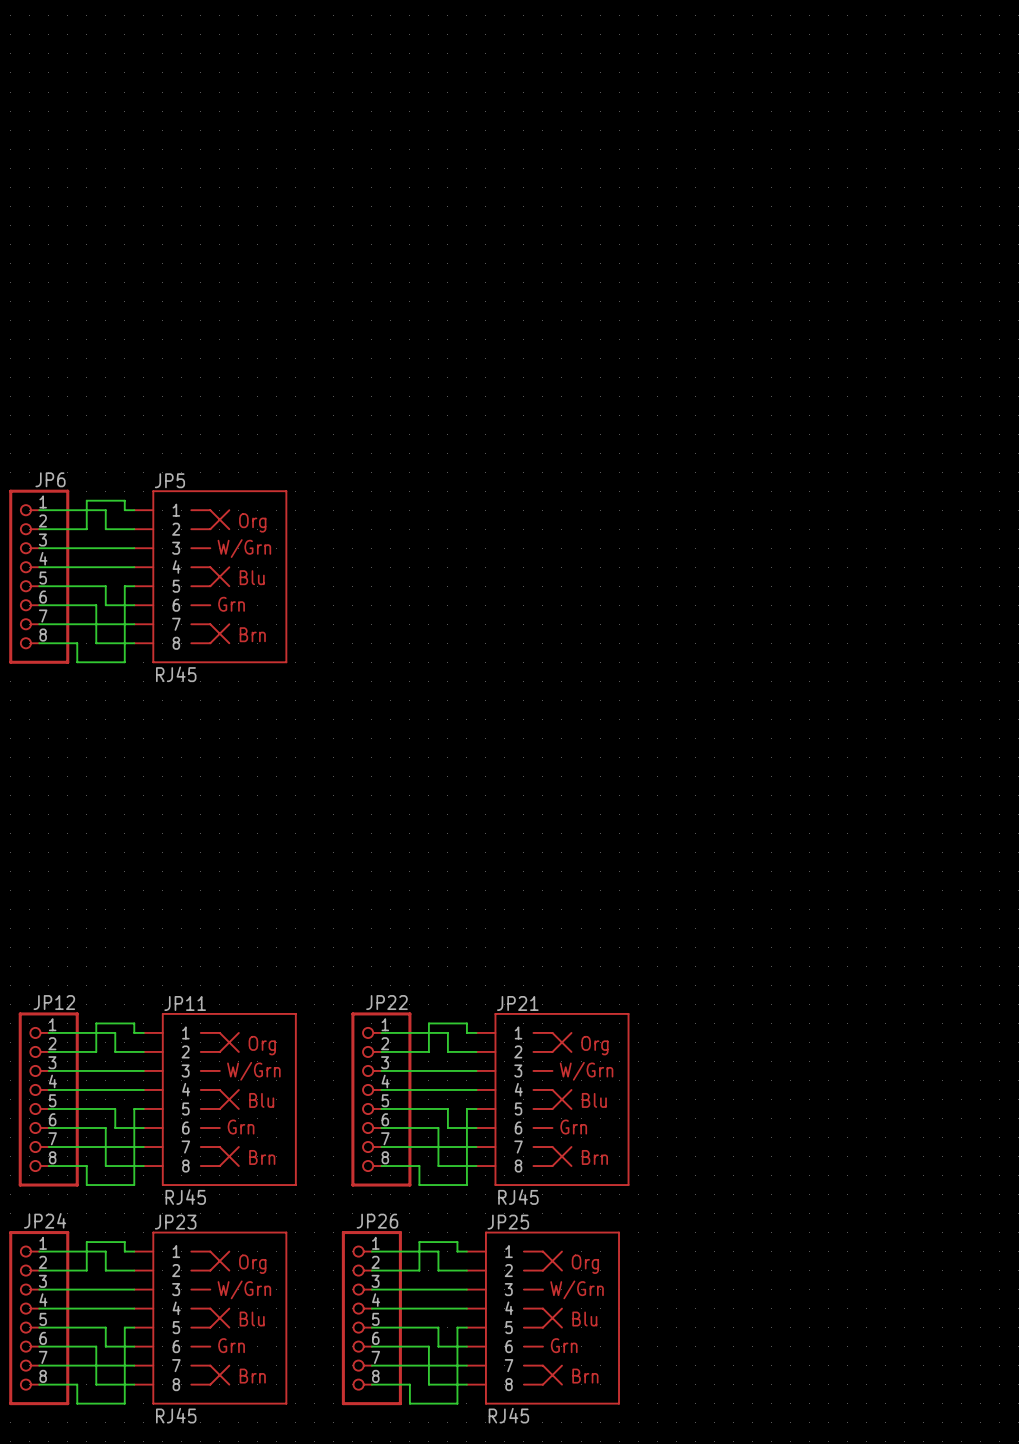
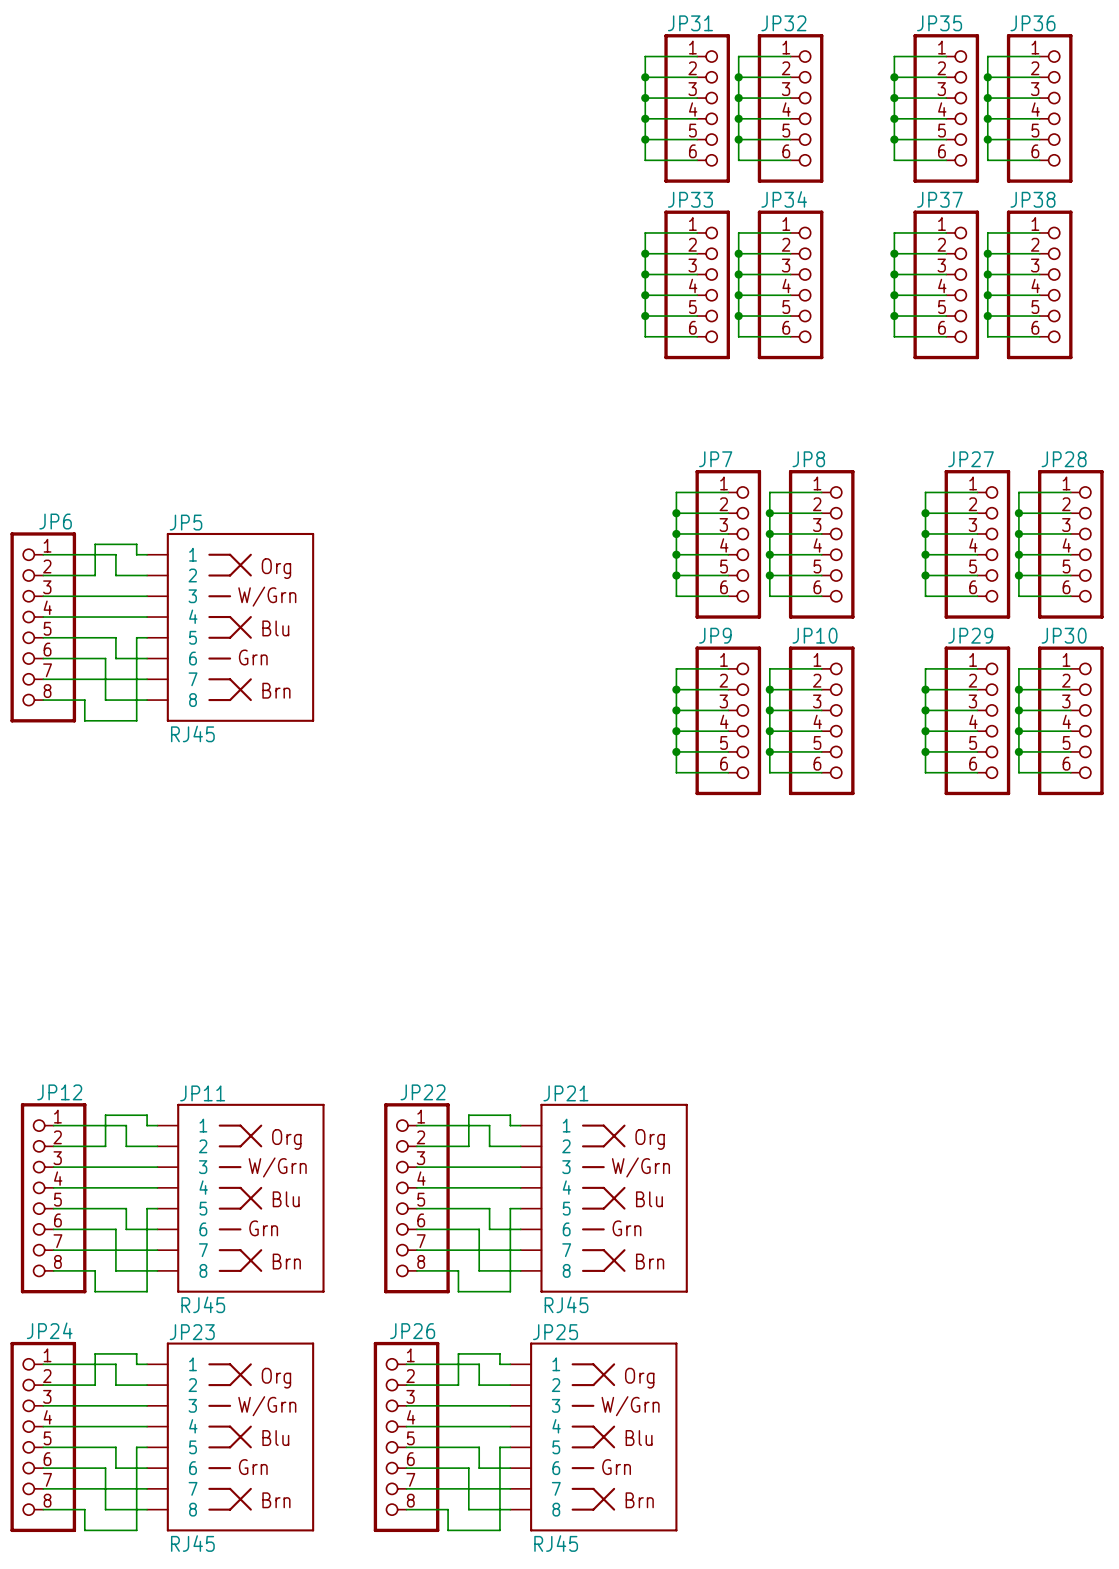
wire: none -> (697, 56) (645, 56) (645, 160) (697, 160)
wire: none -> (790, 56) (738, 56) (738, 160) (790, 160)
wire: none -> (946, 56) (894, 56) (894, 160) (946, 160)
wire: none -> (1039, 56) (987, 56) (987, 160) (1039, 160)
wire: none -> (645, 77) (697, 77)
junction: none -> (645, 77)
wire: none -> (738, 77) (790, 77)
junction: none -> (738, 77)
wire: none -> (894, 77) (946, 77)
junction: none -> (894, 77)
wire: none -> (987, 77) (1039, 77)
junction: none -> (987, 77)
wire: none -> (645, 98) (697, 98)
junction: none -> (645, 98)
wire: none -> (738, 98) (790, 98)
junction: none -> (738, 98)
wire: none -> (894, 98) (946, 98)
junction: none -> (894, 98)
wire: none -> (987, 98) (1039, 98)
junction: none -> (987, 98)
JP31: none -> (697, 108)
JP32: none -> (790, 108)
JP35: none -> (946, 108)
JP36: none -> (1039, 108)
wire: none -> (645, 118) (697, 118)
junction: none -> (645, 118)
wire: none -> (738, 118) (790, 118)
junction: none -> (738, 118)
wire: none -> (894, 118) (946, 118)
junction: none -> (894, 118)
wire: none -> (987, 118) (1039, 118)
junction: none -> (987, 118)
wire: none -> (645, 139) (697, 139)
junction: none -> (645, 139)
wire: none -> (738, 139) (790, 139)
junction: none -> (738, 139)
wire: none -> (894, 139) (946, 139)
junction: none -> (894, 139)
wire: none -> (987, 139) (1039, 139)
junction: none -> (987, 139)
wire: none -> (697, 232) (645, 232) (645, 336) (697, 336)
wire: none -> (790, 232) (738, 232) (738, 336) (790, 336)
wire: none -> (946, 232) (894, 232) (894, 336) (946, 336)
wire: none -> (1039, 232) (987, 232) (987, 336) (1039, 336)
wire: none -> (645, 253) (697, 253)
junction: none -> (645, 253)
wire: none -> (738, 253) (790, 253)
junction: none -> (738, 253)
wire: none -> (894, 253) (946, 253)
junction: none -> (894, 253)
wire: none -> (987, 253) (1039, 253)
junction: none -> (987, 253)
wire: none -> (645, 274) (697, 274)
junction: none -> (645, 274)
wire: none -> (738, 274) (790, 274)
junction: none -> (738, 274)
wire: none -> (894, 274) (946, 274)
junction: none -> (894, 274)
wire: none -> (987, 274) (1039, 274)
junction: none -> (987, 274)
JP33: none -> (697, 284)
JP34: none -> (790, 284)
JP37: none -> (946, 284)
JP38: none -> (1039, 284)
wire: none -> (645, 295) (697, 295)
junction: none -> (645, 295)
wire: none -> (738, 295) (790, 295)
junction: none -> (738, 295)
wire: none -> (894, 295) (946, 295)
junction: none -> (894, 295)
wire: none -> (987, 295) (1039, 295)
junction: none -> (987, 295)
wire: none -> (645, 316) (697, 316)
junction: none -> (645, 316)
wire: none -> (738, 316) (790, 316)
junction: none -> (738, 316)
wire: none -> (894, 316) (946, 316)
junction: none -> (894, 316)
wire: none -> (987, 316) (1039, 316)
junction: none -> (987, 316)
wire: none -> (728, 492) (676, 492) (676, 596) (728, 596)
wire: none -> (821, 492) (769, 492) (769, 596) (821, 596)
wire: none -> (977, 492) (925, 492) (925, 596) (977, 596)
wire: none -> (1070, 492) (1018, 492) (1018, 596) (1070, 596)
wire: none -> (676, 513) (728, 513)
junction: none -> (676, 513)
wire: none -> (769, 513) (821, 513)
junction: none -> (769, 513)
wire: none -> (925, 513) (977, 513)
junction: none -> (925, 513)
wire: none -> (1018, 513) (1070, 513)
junction: none -> (1018, 513)
wire: none -> (676, 533) (728, 533)
junction: none -> (676, 533)
wire: none -> (769, 533) (821, 533)
junction: none -> (769, 533)
wire: none -> (925, 533) (977, 533)
junction: none -> (925, 533)
wire: none -> (1018, 533) (1070, 533)
junction: none -> (1018, 533)
JP7: none -> (728, 544)
JP8: none -> (821, 544)
JP27: none -> (977, 544)
JP28: none -> (1070, 544)
wire: none -> (676, 554) (728, 554)
junction: none -> (676, 554)
wire: none -> (769, 554) (821, 554)
junction: none -> (769, 554)
wire: none -> (925, 554) (977, 554)
junction: none -> (925, 554)
wire: none -> (1018, 554) (1070, 554)
junction: none -> (1018, 554)
wire: none -> (676, 575) (728, 575)
junction: none -> (676, 575)
wire: none -> (769, 575) (821, 575)
junction: none -> (769, 575)
wire: none -> (925, 575) (977, 575)
junction: none -> (925, 575)
wire: none -> (1018, 575) (1070, 575)
junction: none -> (1018, 575)
wire: none -> (728, 668) (676, 668) (676, 772) (728, 772)
wire: none -> (821, 668) (769, 668) (769, 772) (821, 772)
wire: none -> (977, 668) (925, 668) (925, 772) (977, 772)
wire: none -> (1070, 668) (1018, 668) (1018, 772) (1070, 772)
wire: none -> (676, 689) (728, 689)
junction: none -> (676, 689)
wire: none -> (769, 689) (821, 689)
junction: none -> (769, 689)
wire: none -> (925, 689) (977, 689)
junction: none -> (925, 689)
wire: none -> (1018, 689) (1070, 689)
junction: none -> (1018, 689)
wire: none -> (676, 710) (728, 710)
junction: none -> (676, 710)
wire: none -> (769, 710) (821, 710)
junction: none -> (769, 710)
wire: none -> (925, 710) (977, 710)
junction: none -> (925, 710)
wire: none -> (1018, 710) (1070, 710)
junction: none -> (1018, 710)
JP9: none -> (728, 720)
JP10: none -> (821, 720)
JP29: none -> (977, 720)
JP30: none -> (1070, 720)
wire: none -> (676, 731) (728, 731)
junction: none -> (676, 731)
wire: none -> (769, 731) (821, 731)
junction: none -> (769, 731)
wire: none -> (925, 731) (977, 731)
junction: none -> (925, 731)
wire: none -> (1018, 731) (1070, 731)
junction: none -> (1018, 731)
wire: none -> (676, 751) (728, 751)
junction: none -> (676, 751)
wire: none -> (769, 751) (821, 751)
junction: none -> (769, 751)
wire: none -> (925, 751) (977, 751)
junction: none -> (925, 751)
wire: none -> (1018, 751) (1070, 751)
junction: none -> (1018, 751)

